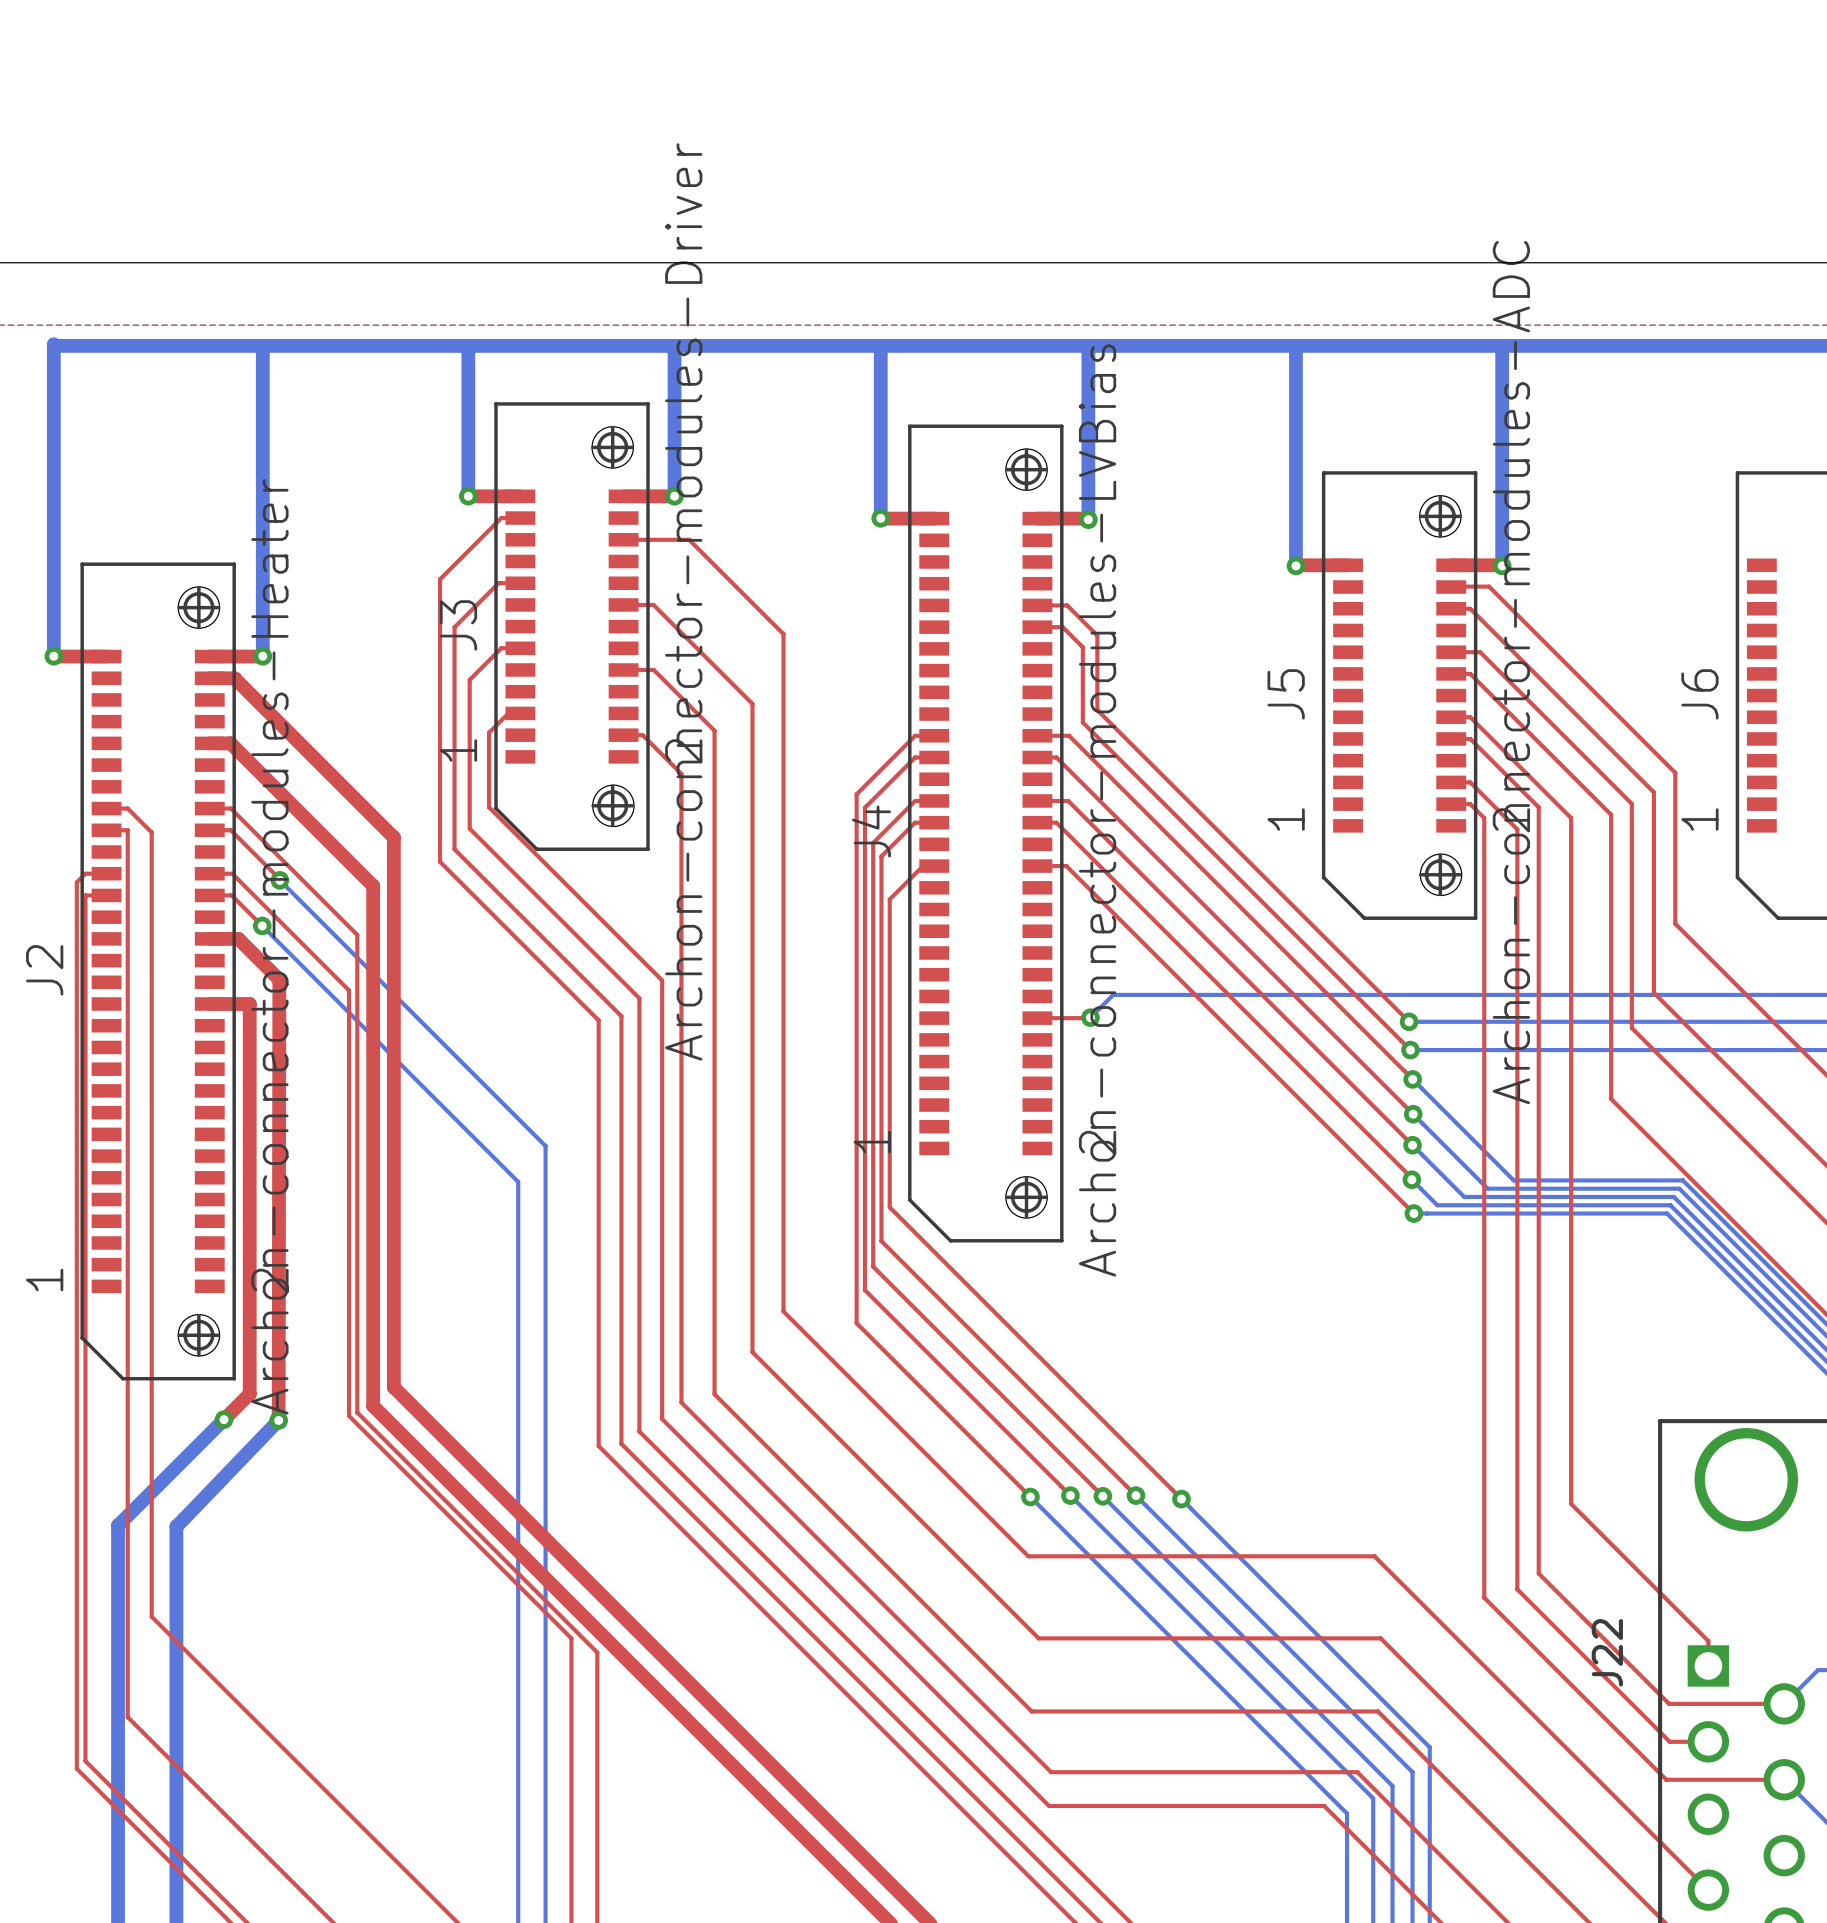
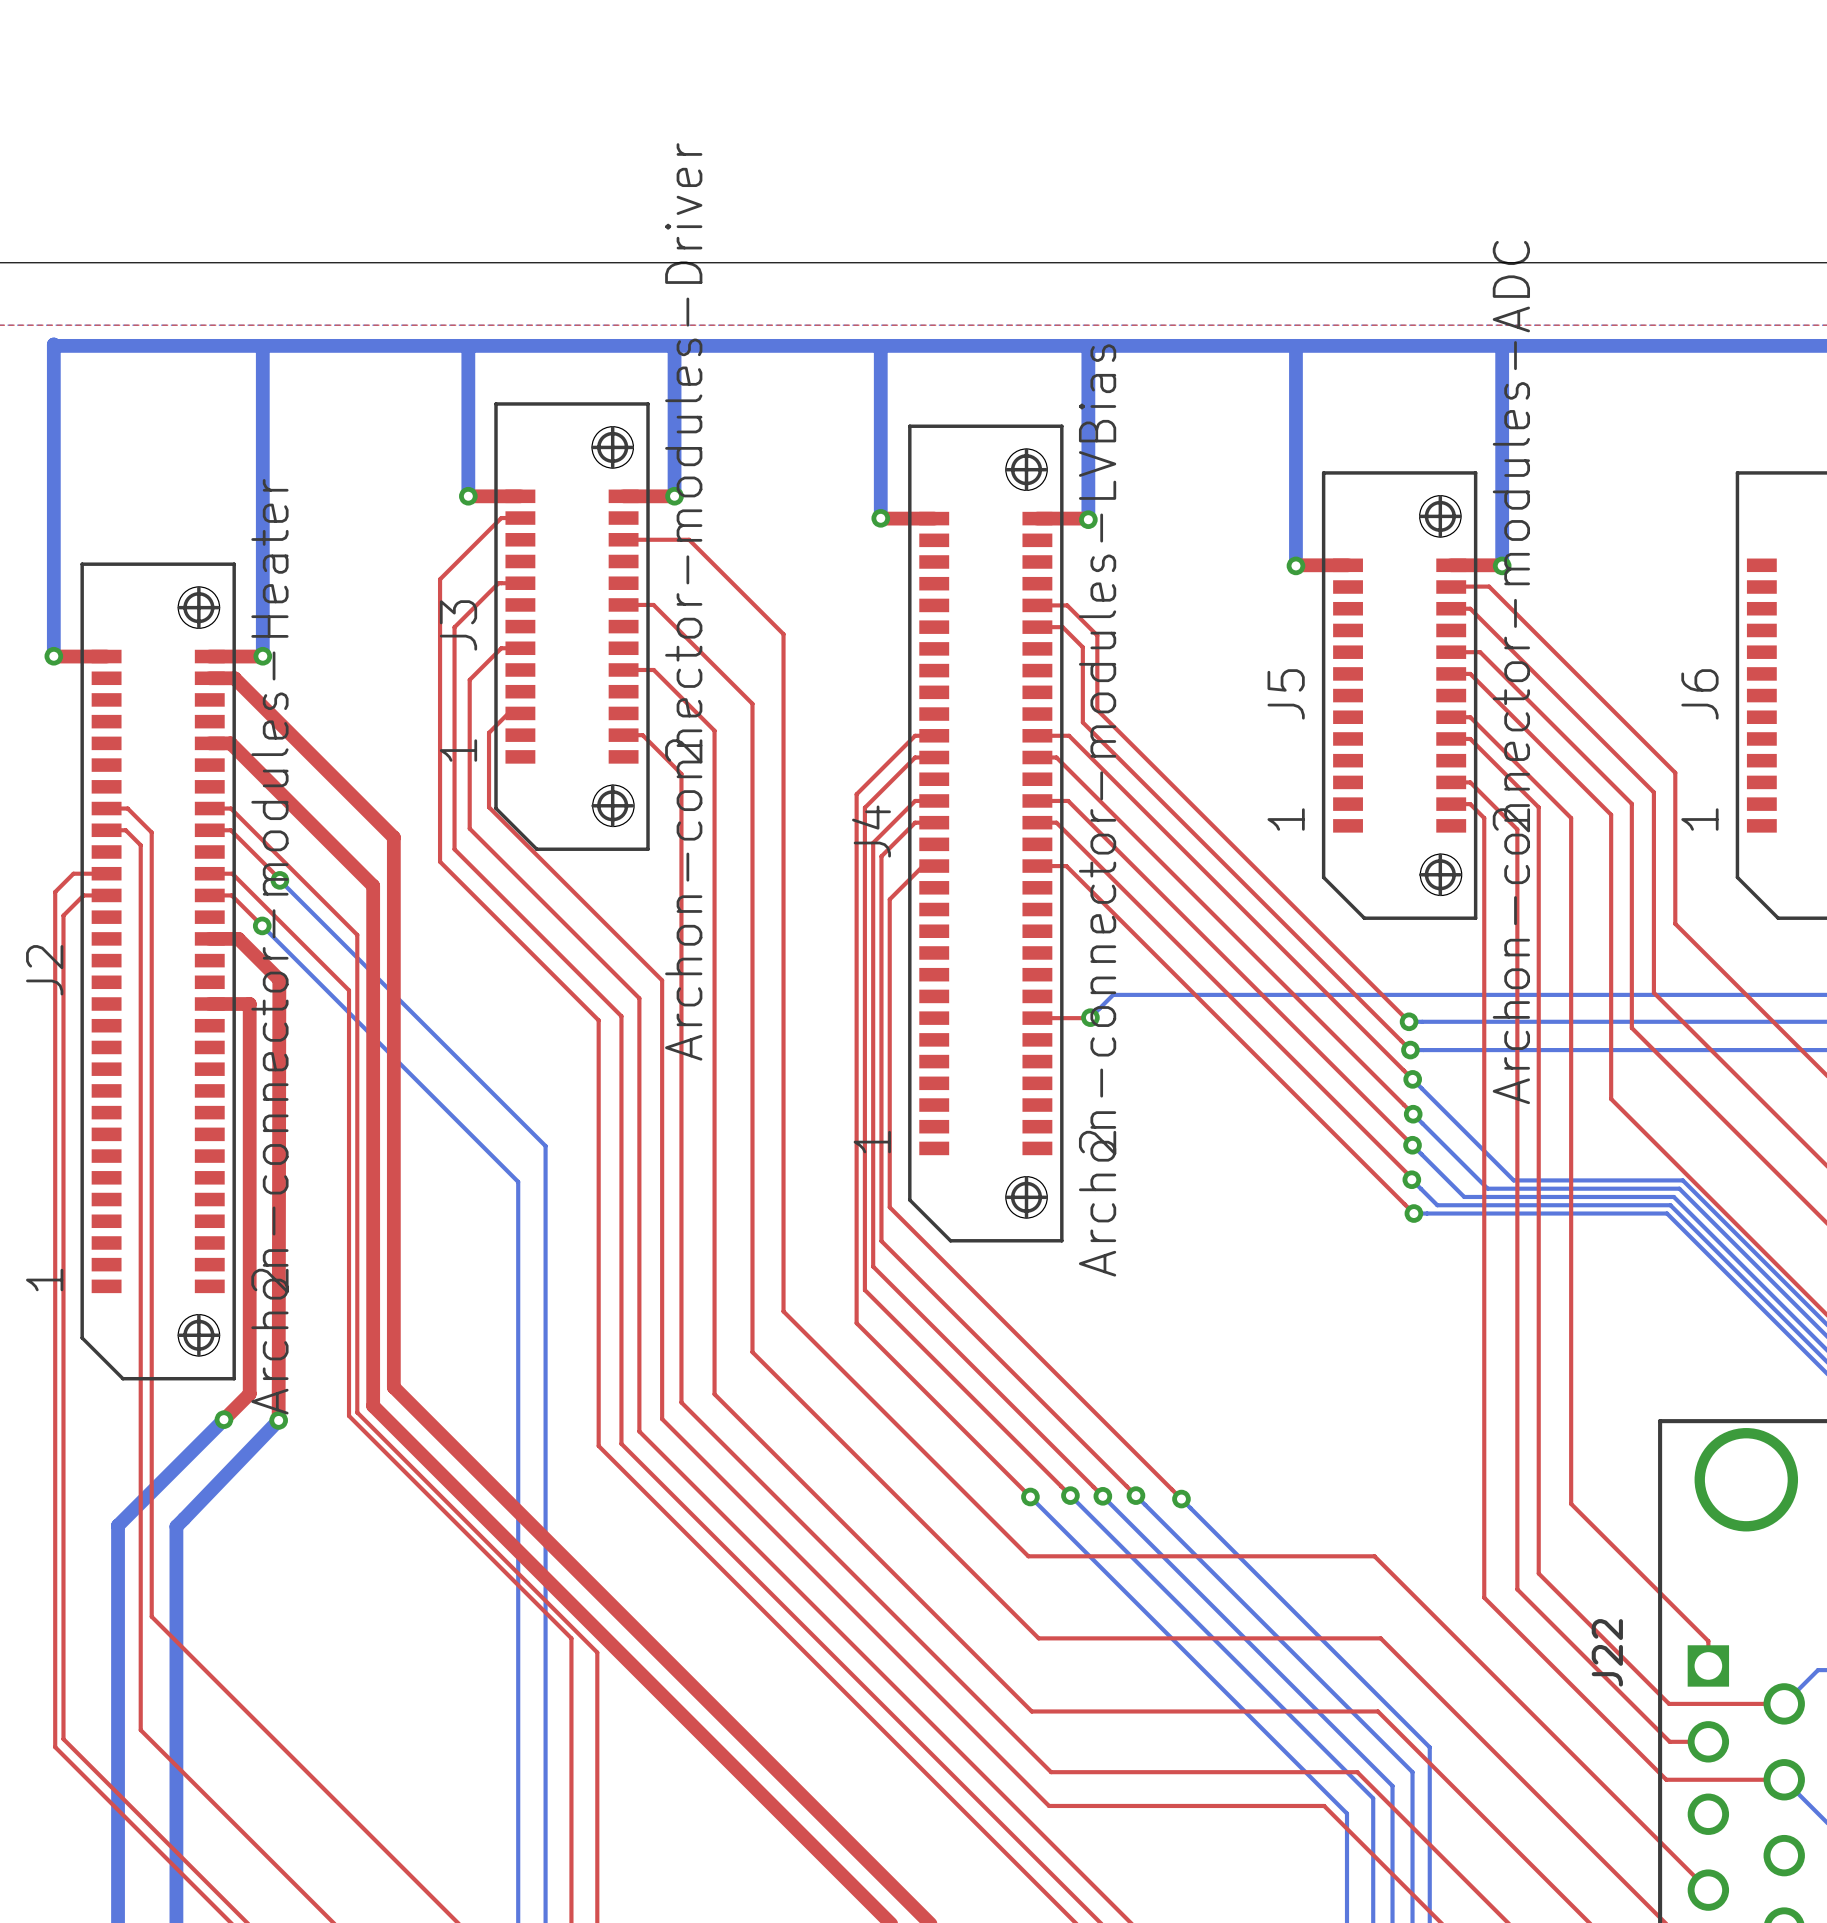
top track: (125, 830) (127, 830) (127, 1717) (140, 1730) -> (125, 830) (140, 845) (140, 1730)
top track: (85, 873) (76, 882) (76, 1768) -> (85, 873) (73, 873) (55, 892) (55, 1747) (76, 1768)
top track: (85, 895) (85, 1761) -> (85, 895) (63, 915) (63, 1739) (85, 1761)

